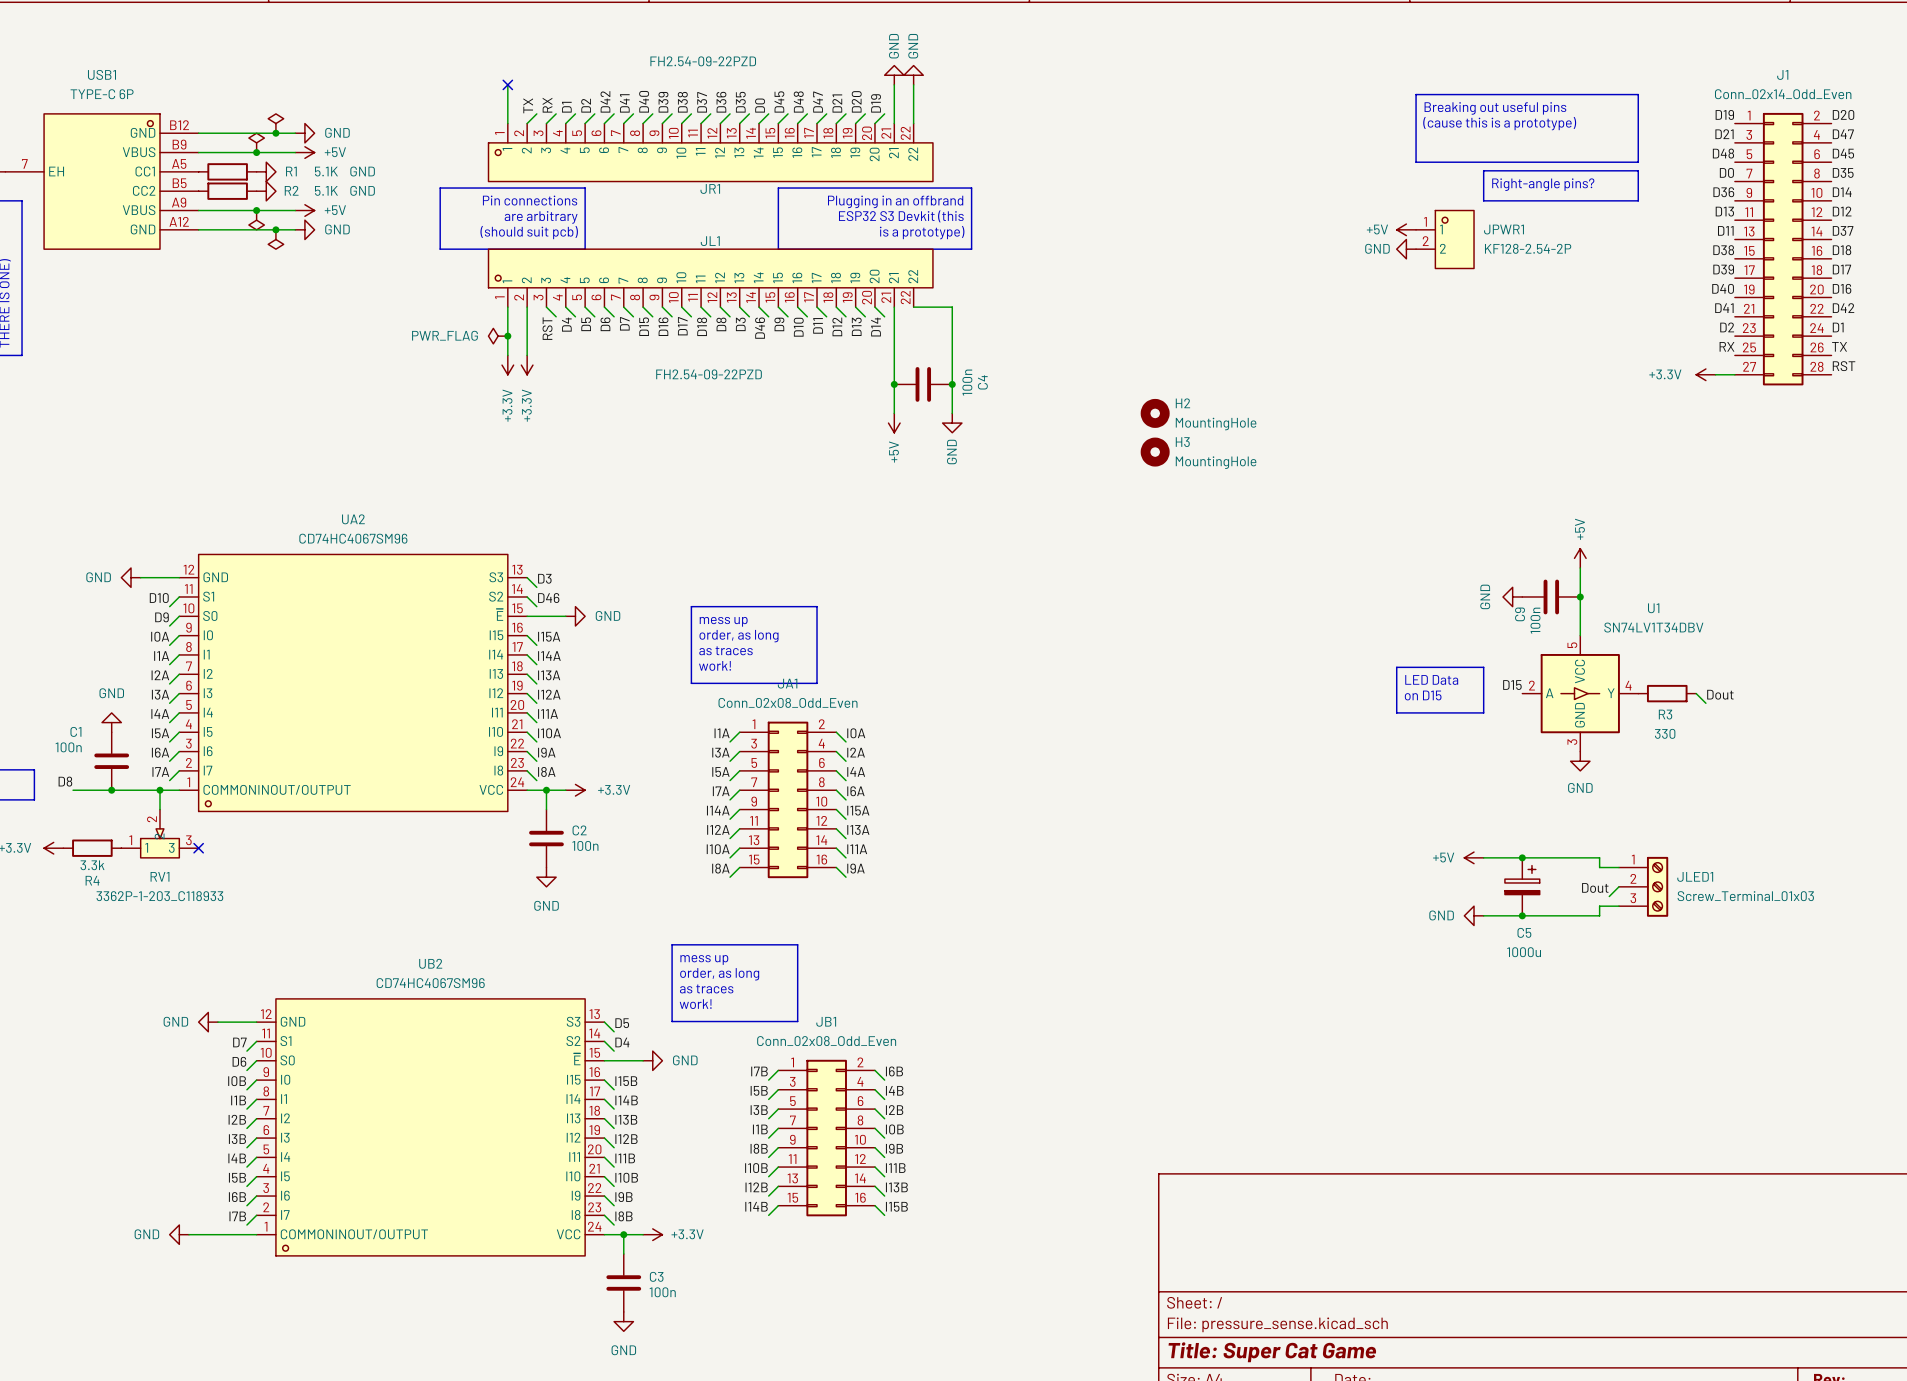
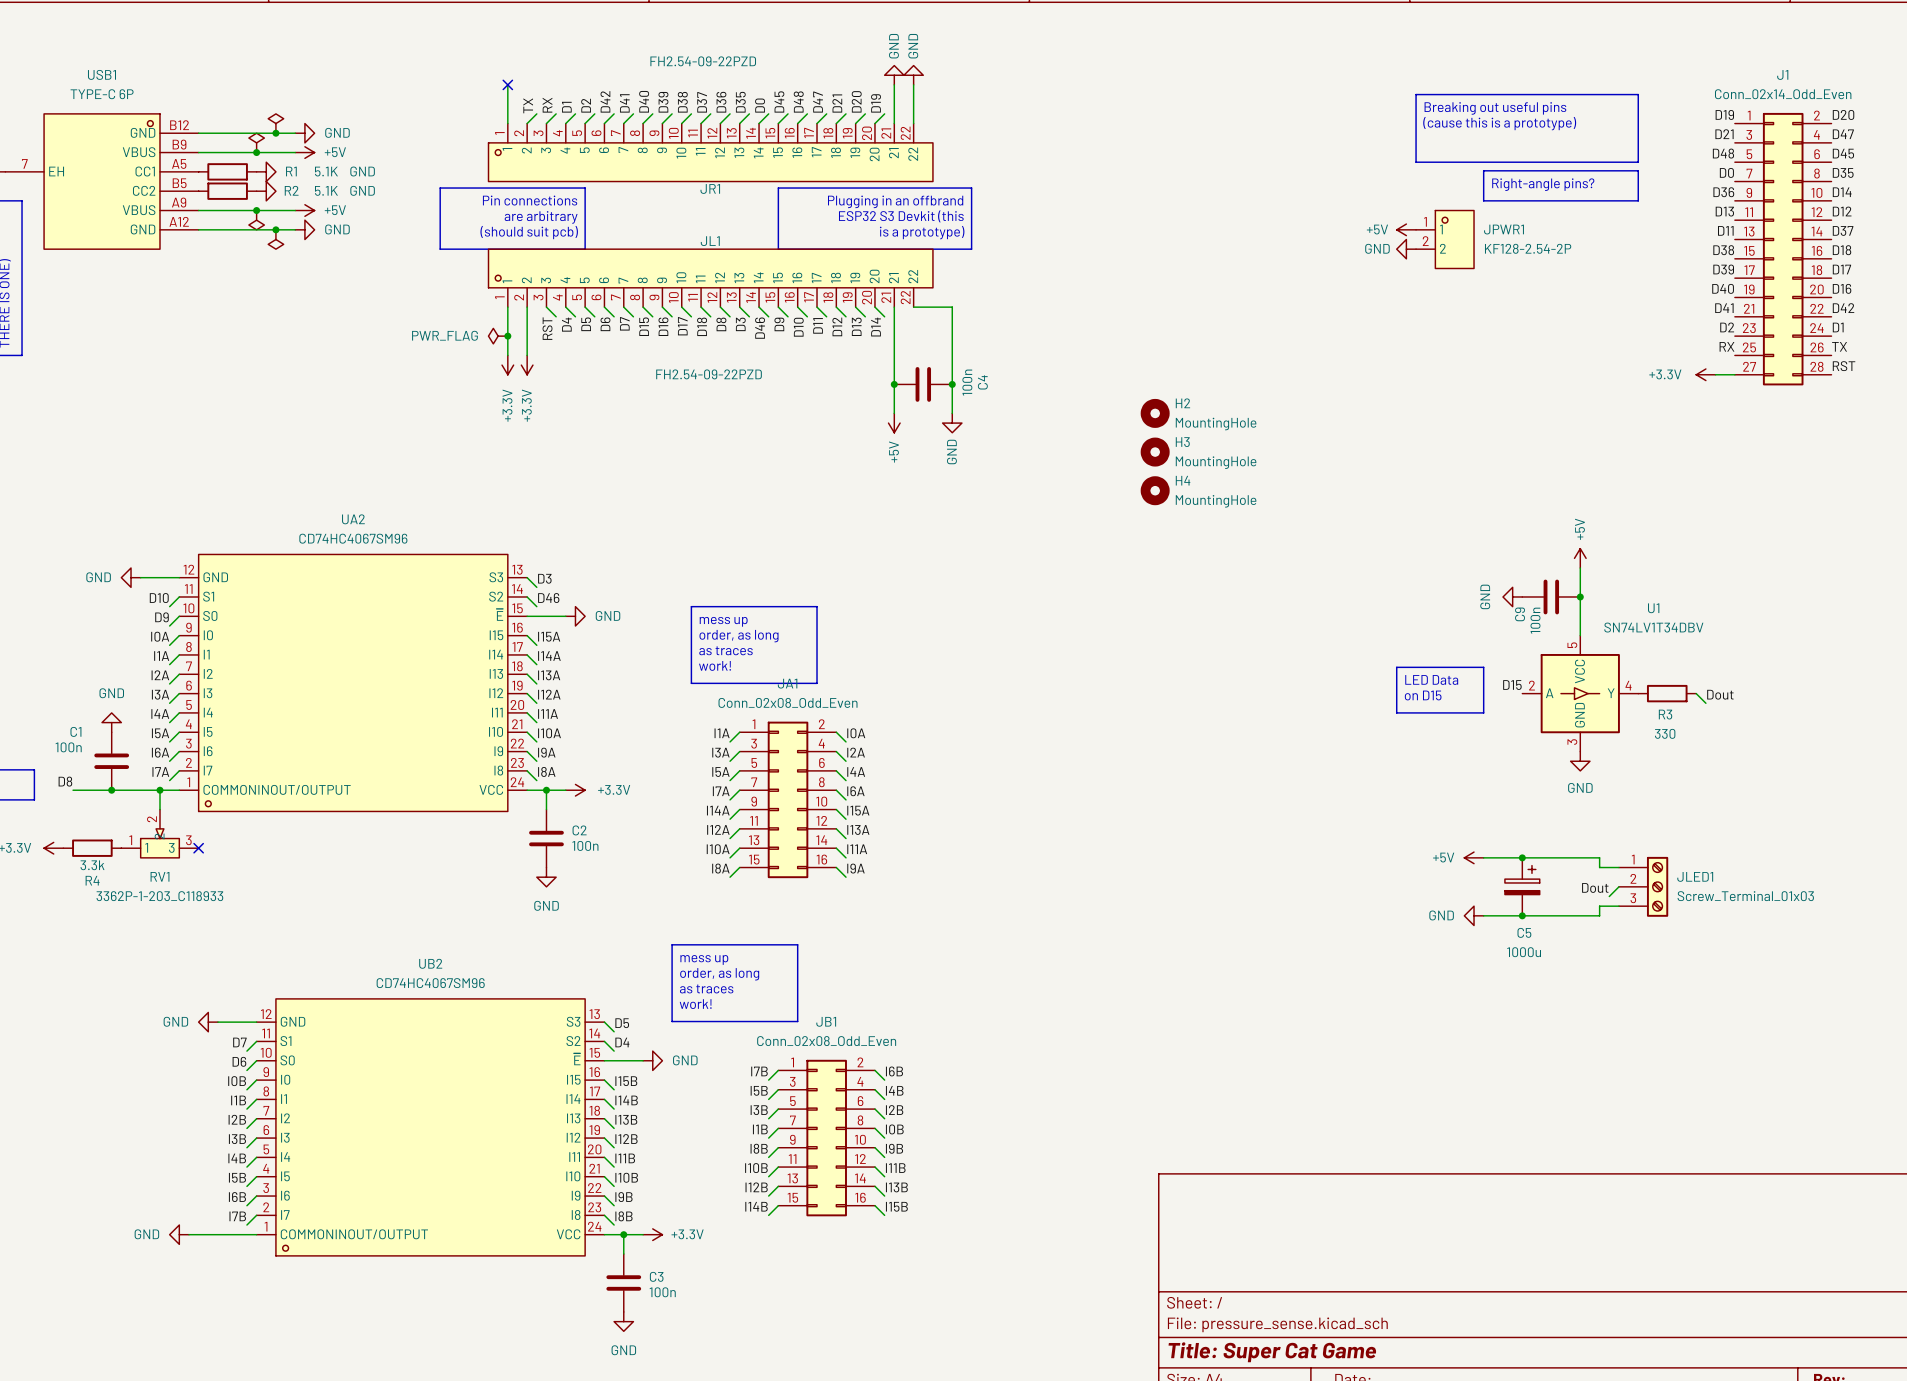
H4: none -> MountingHole (1155, 490)

